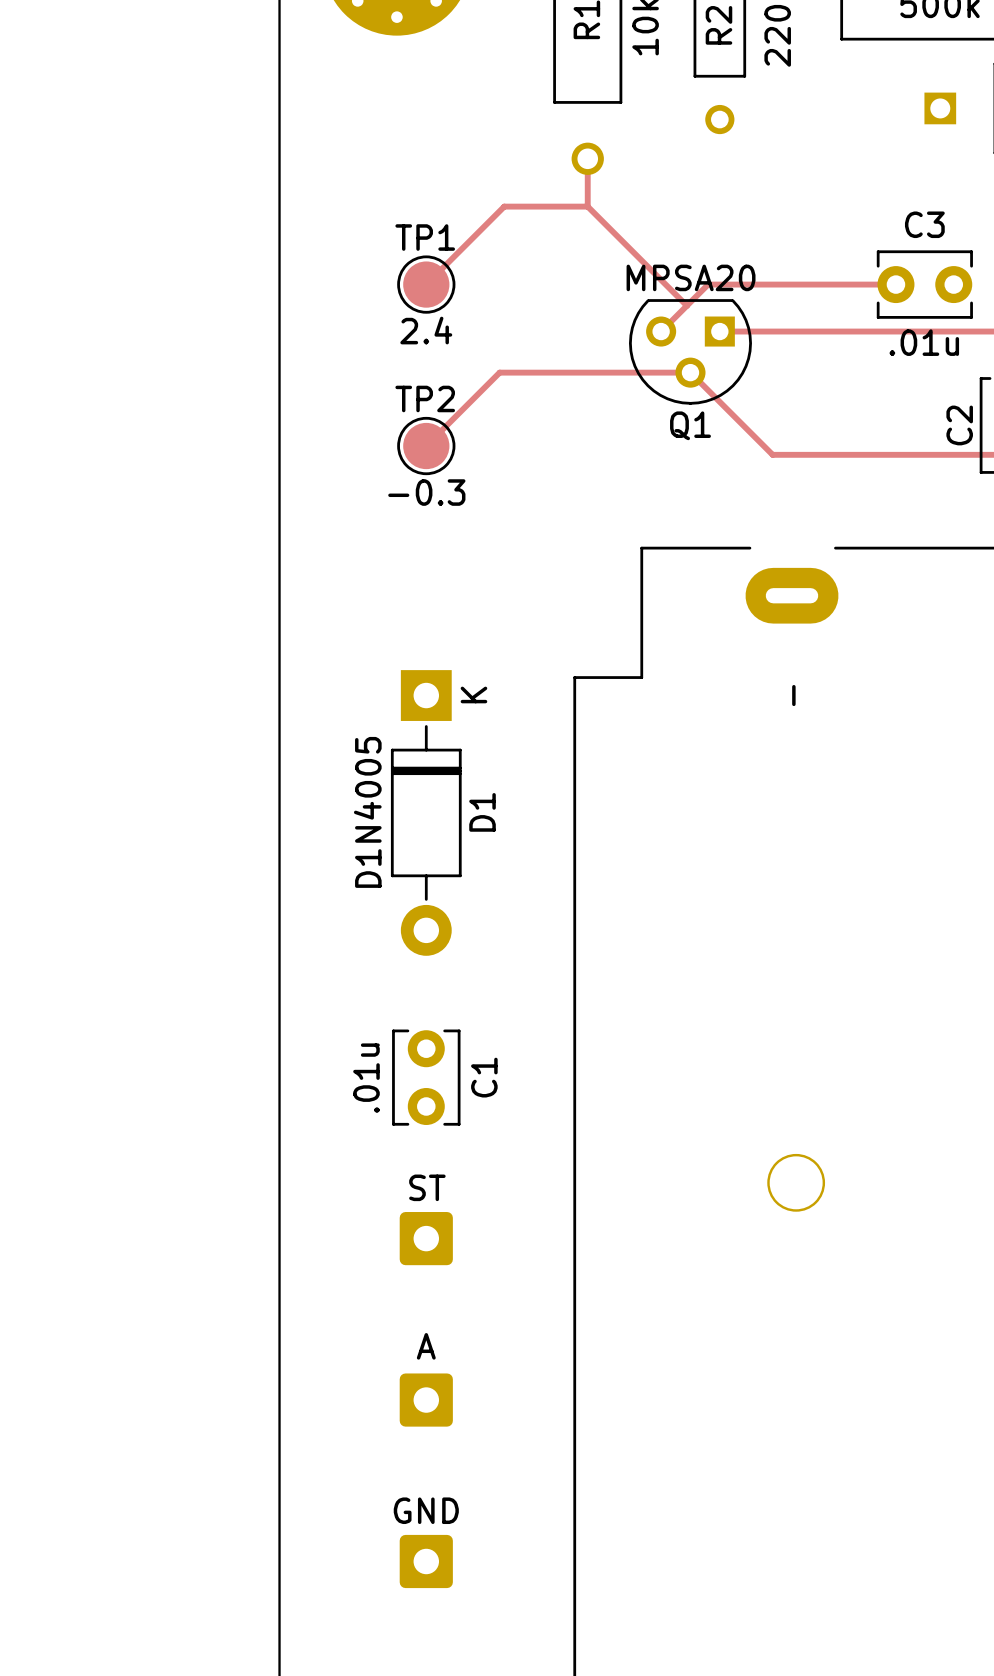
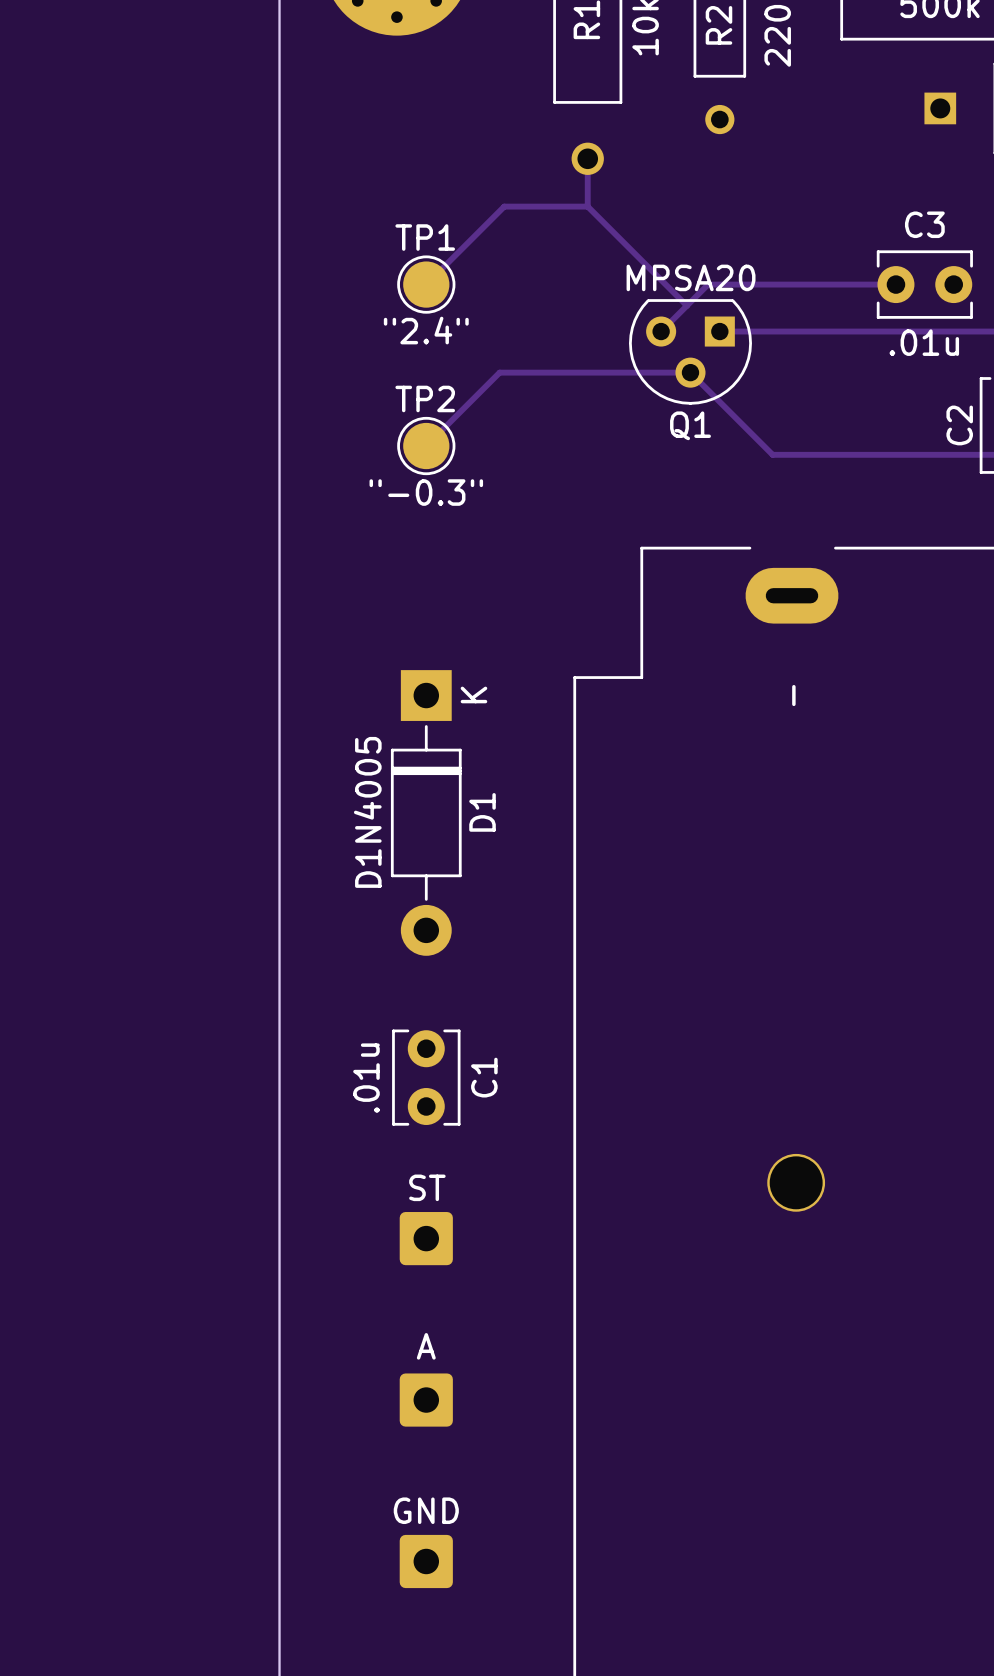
TP1 value: 2.4 (426, 330) -> "2.4" (426, 330)
TP2 value: -0.3 (426, 492) -> "-0.3" (426, 492)

